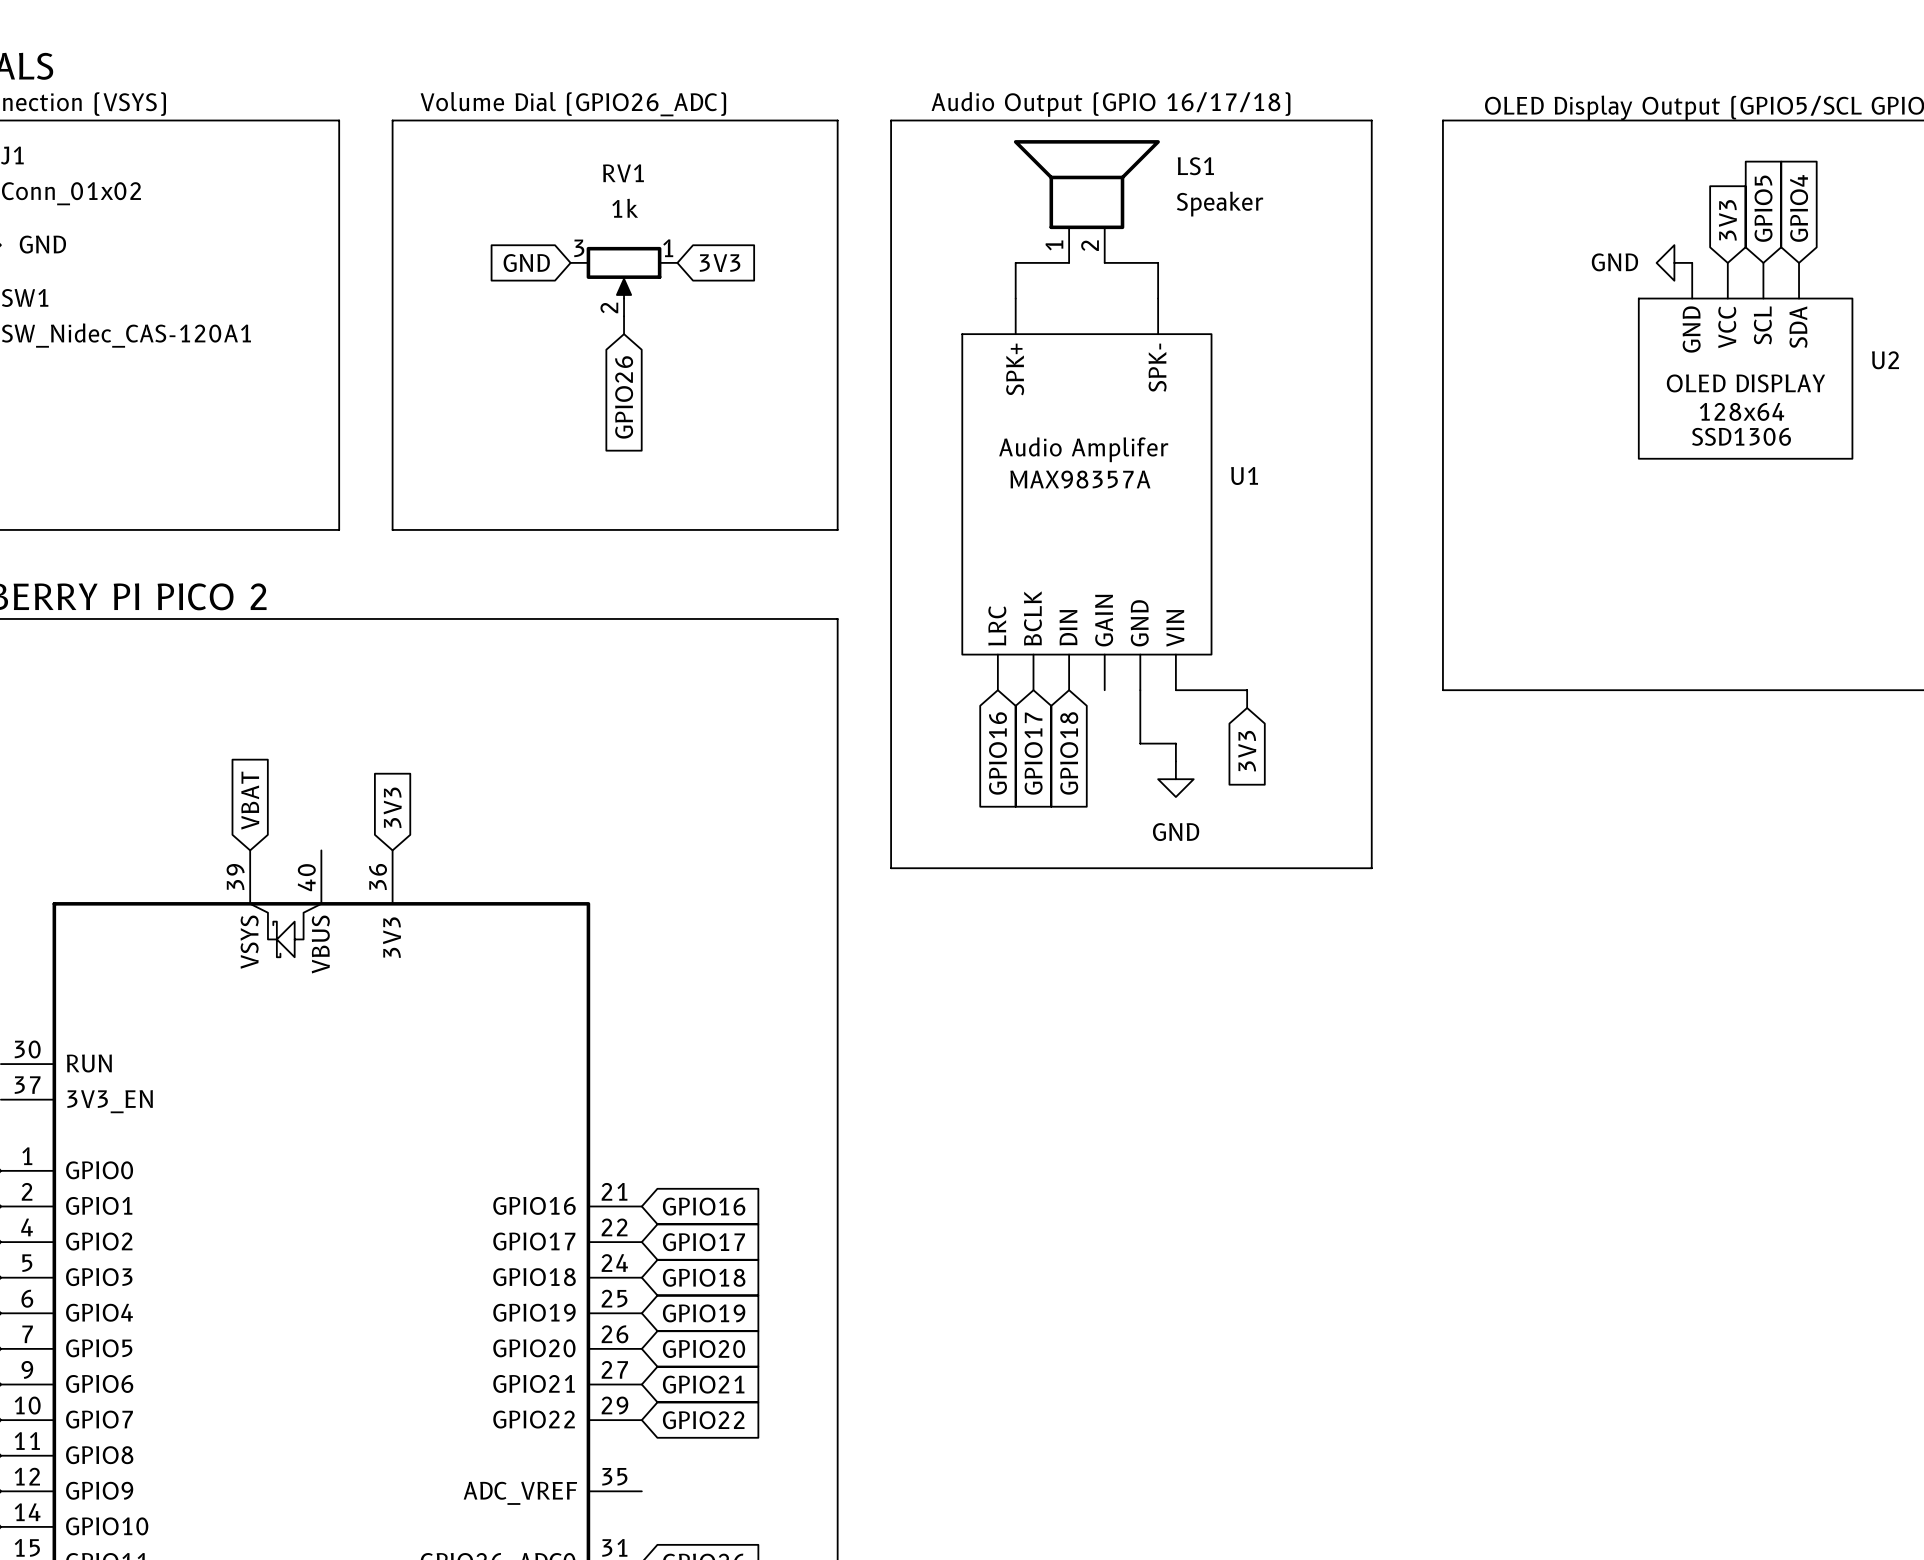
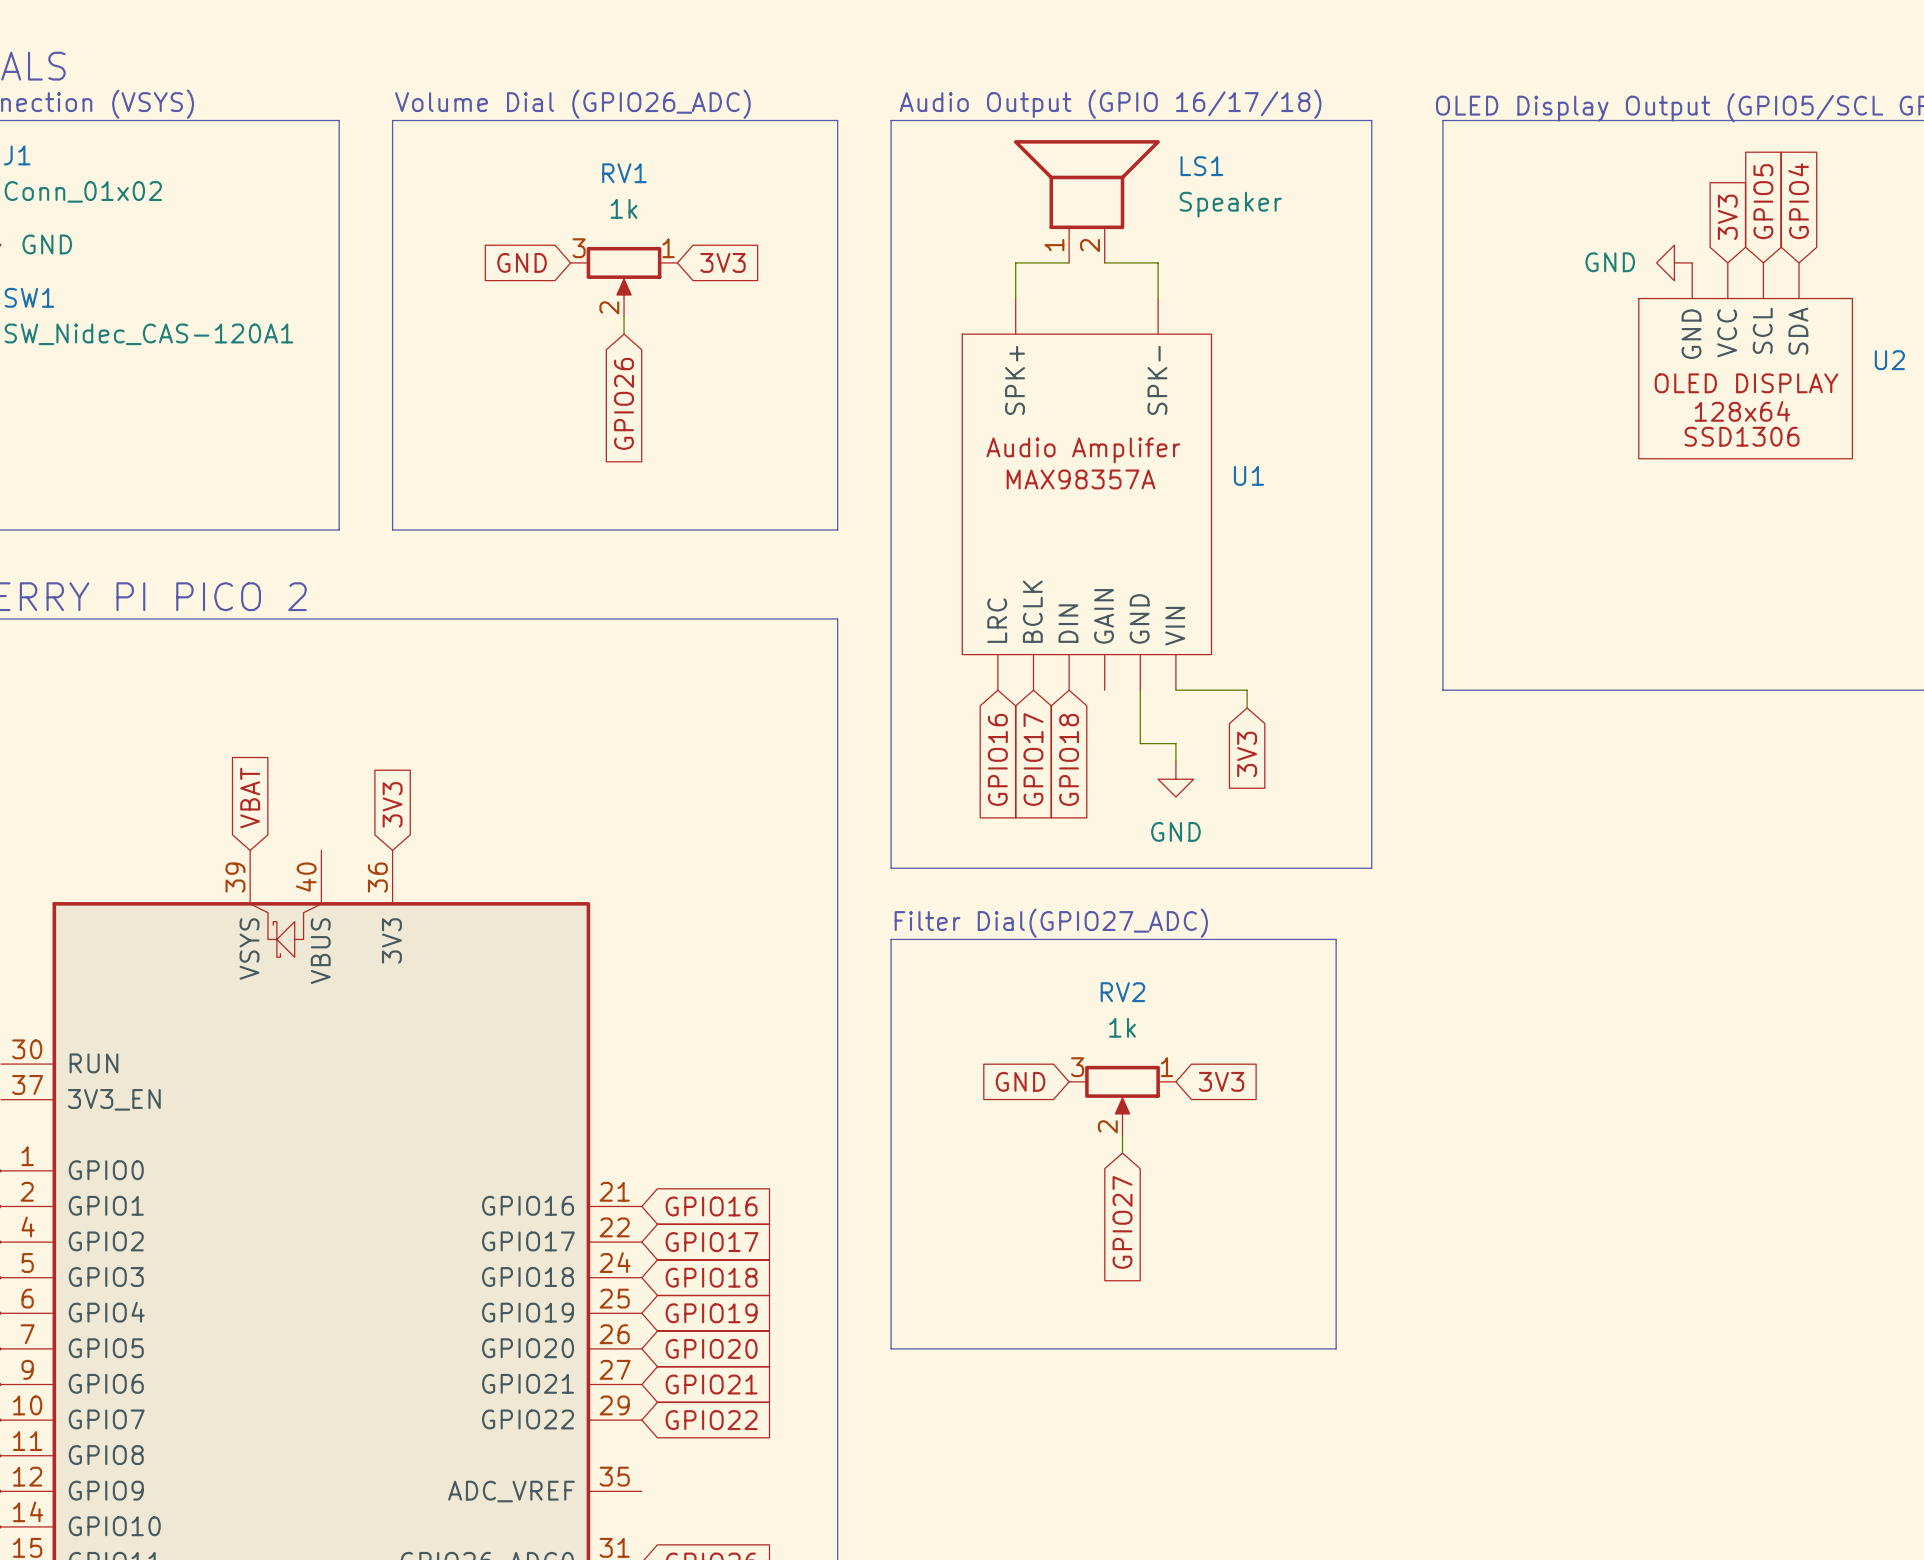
text: none -> Filter Dial(GPIO27_ADC) (1051, 923)
line: none -> (891, 939) (1336, 939) (1336, 1348) (891, 1348) (891, 939)
global label: none -> GND (1020, 1081)
global label: none -> 3V3 (1221, 1081)
RV2: none -> 1k (1122, 1100)
wire: none -> (1122, 1135) (1122, 1153)
global label: none -> GPIO27 (1122, 1222)

